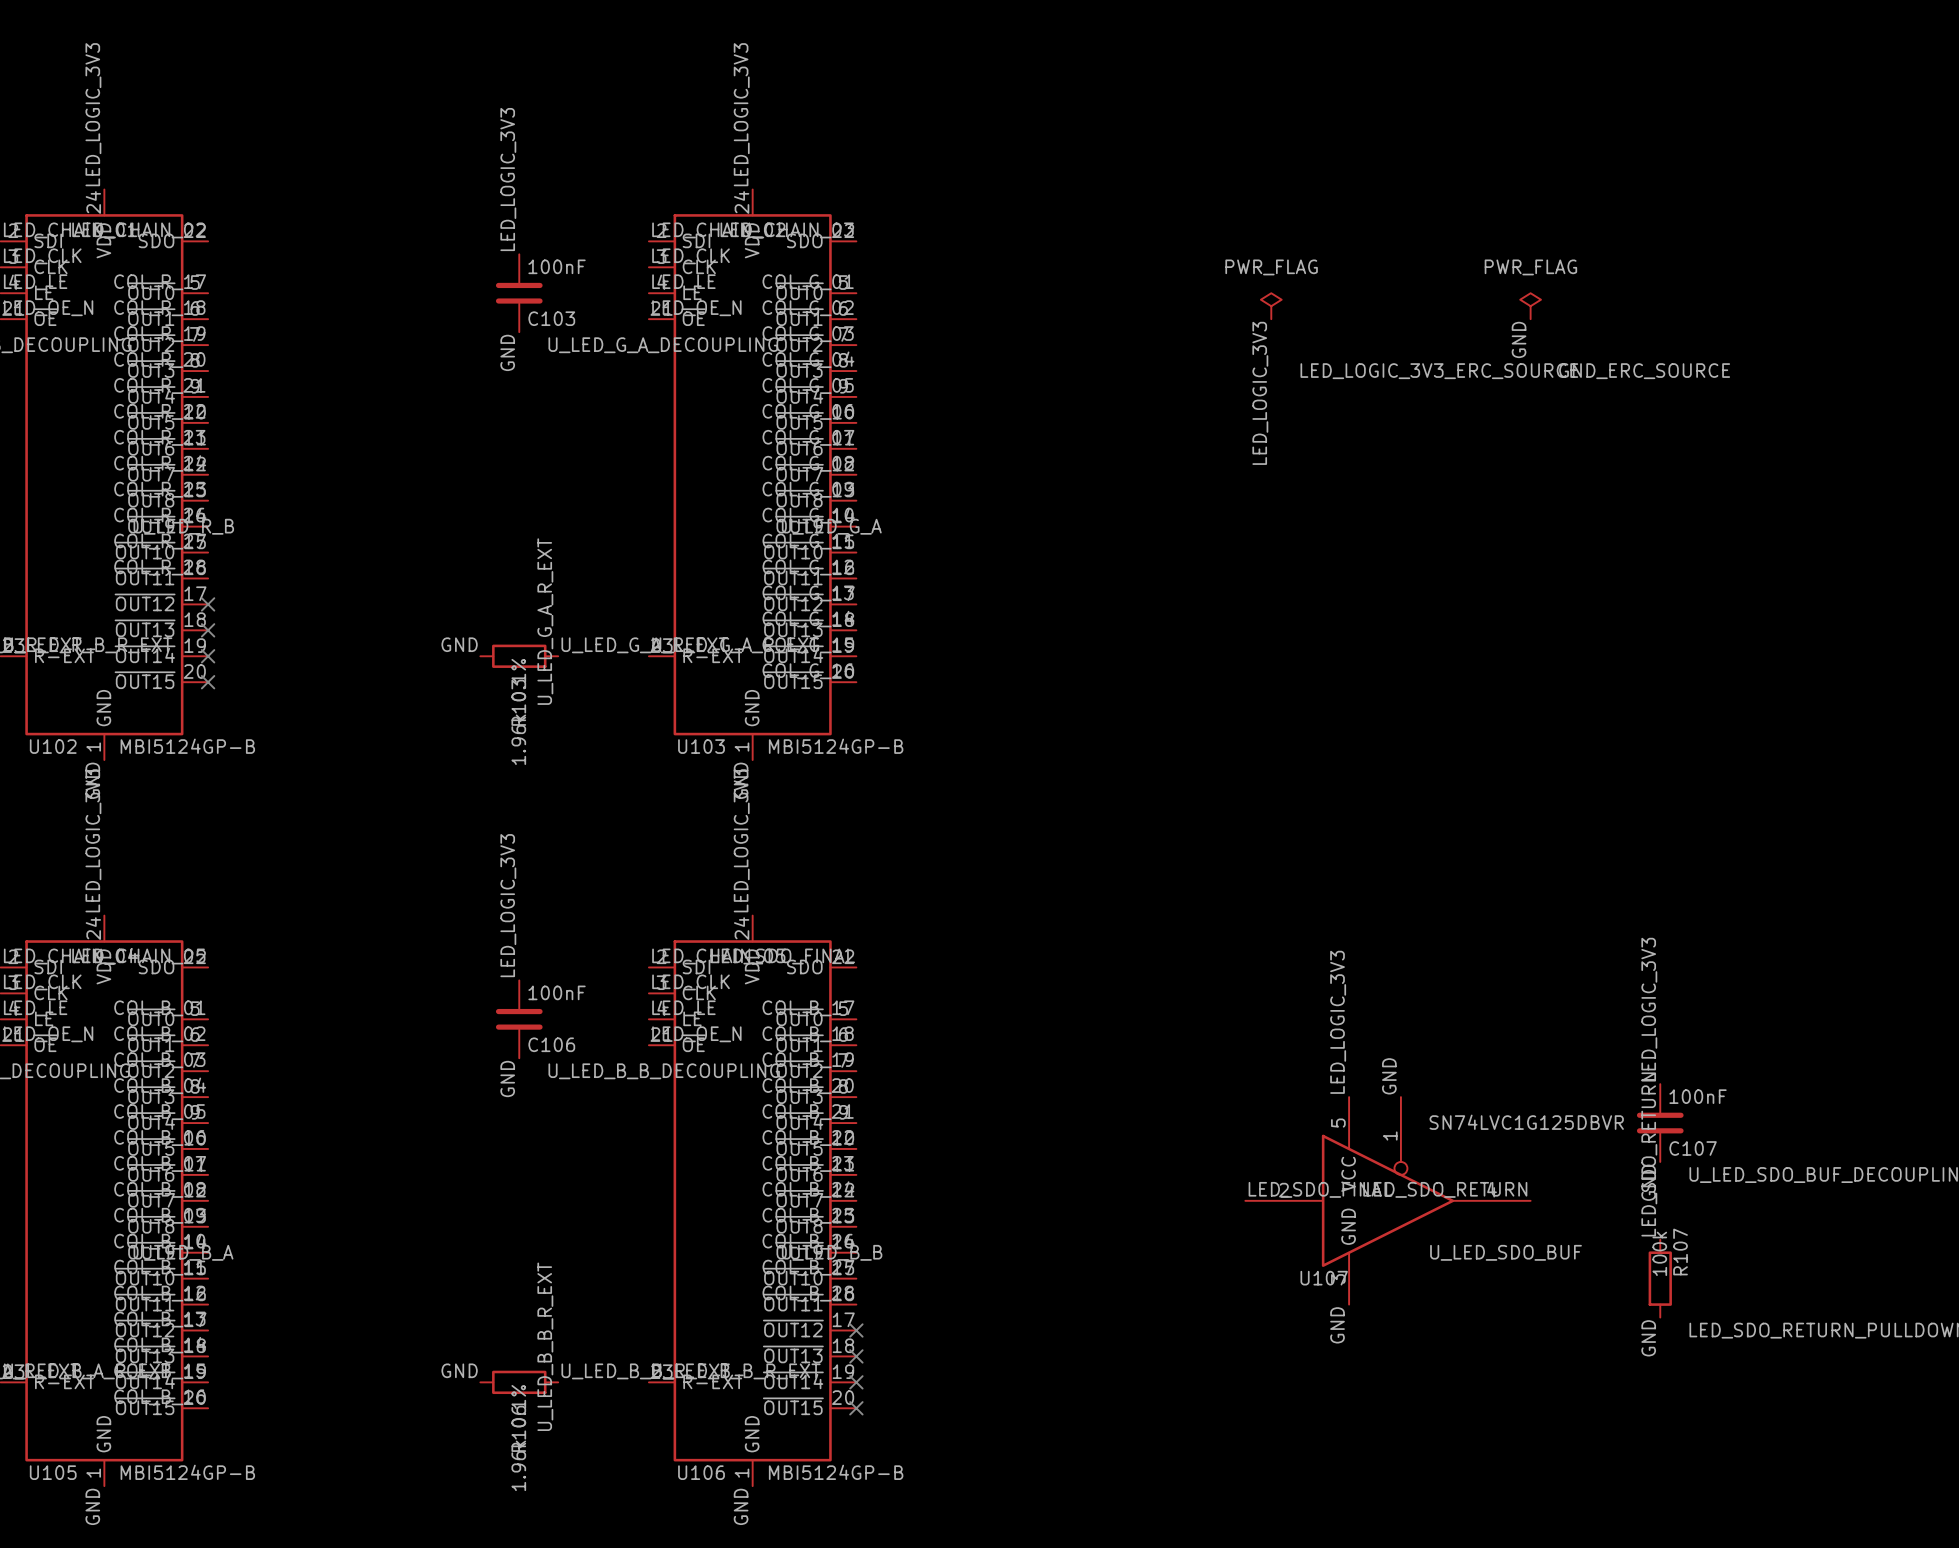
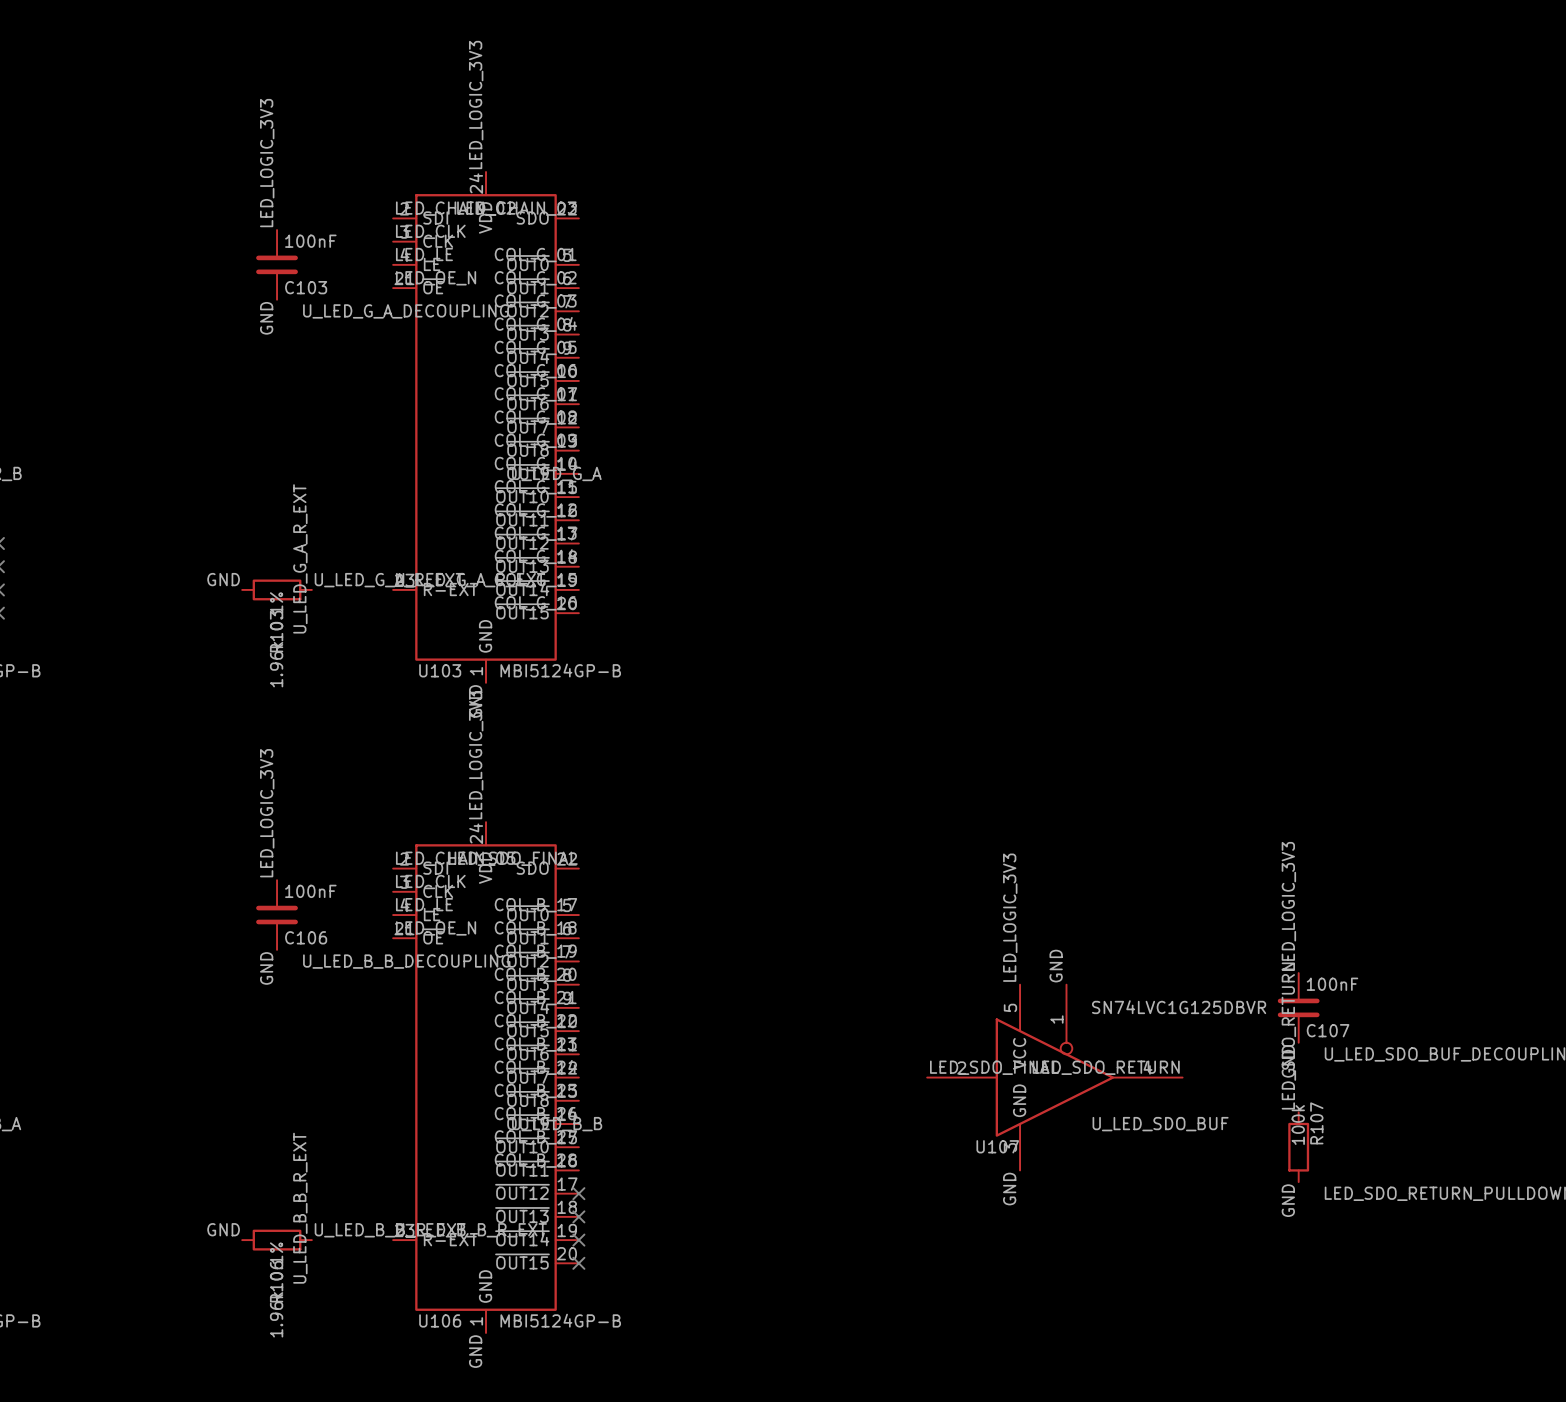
power symbol: PWR_FLAG (1271, 306) -> none
power symbol: PWR_FLAG (1530, 306) -> none
label: GND (1519, 339) -> none
label: LED_LOGIC_3V3 (1260, 393) -> none

